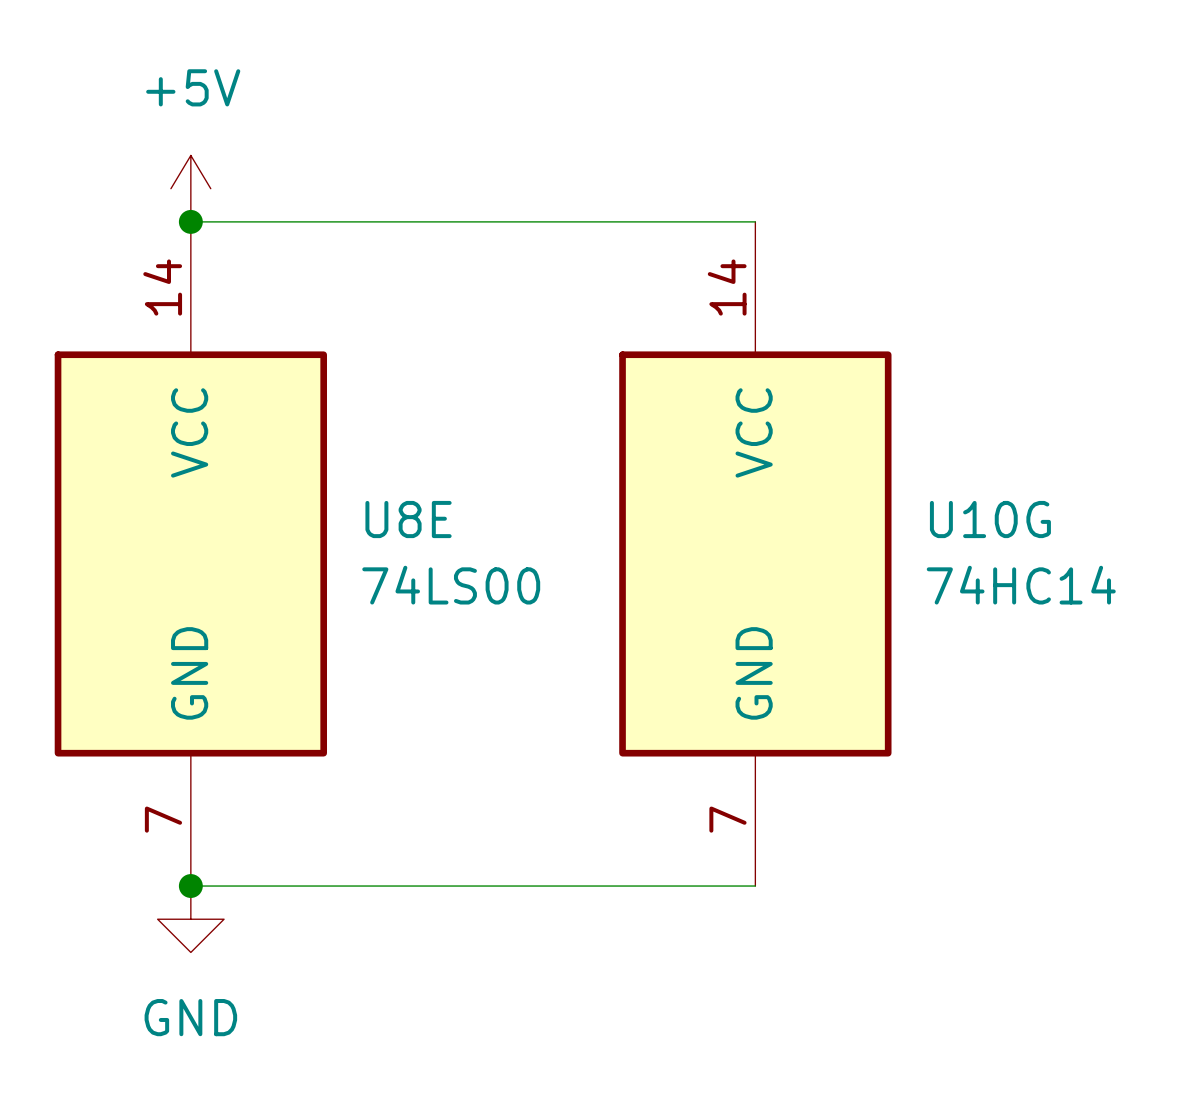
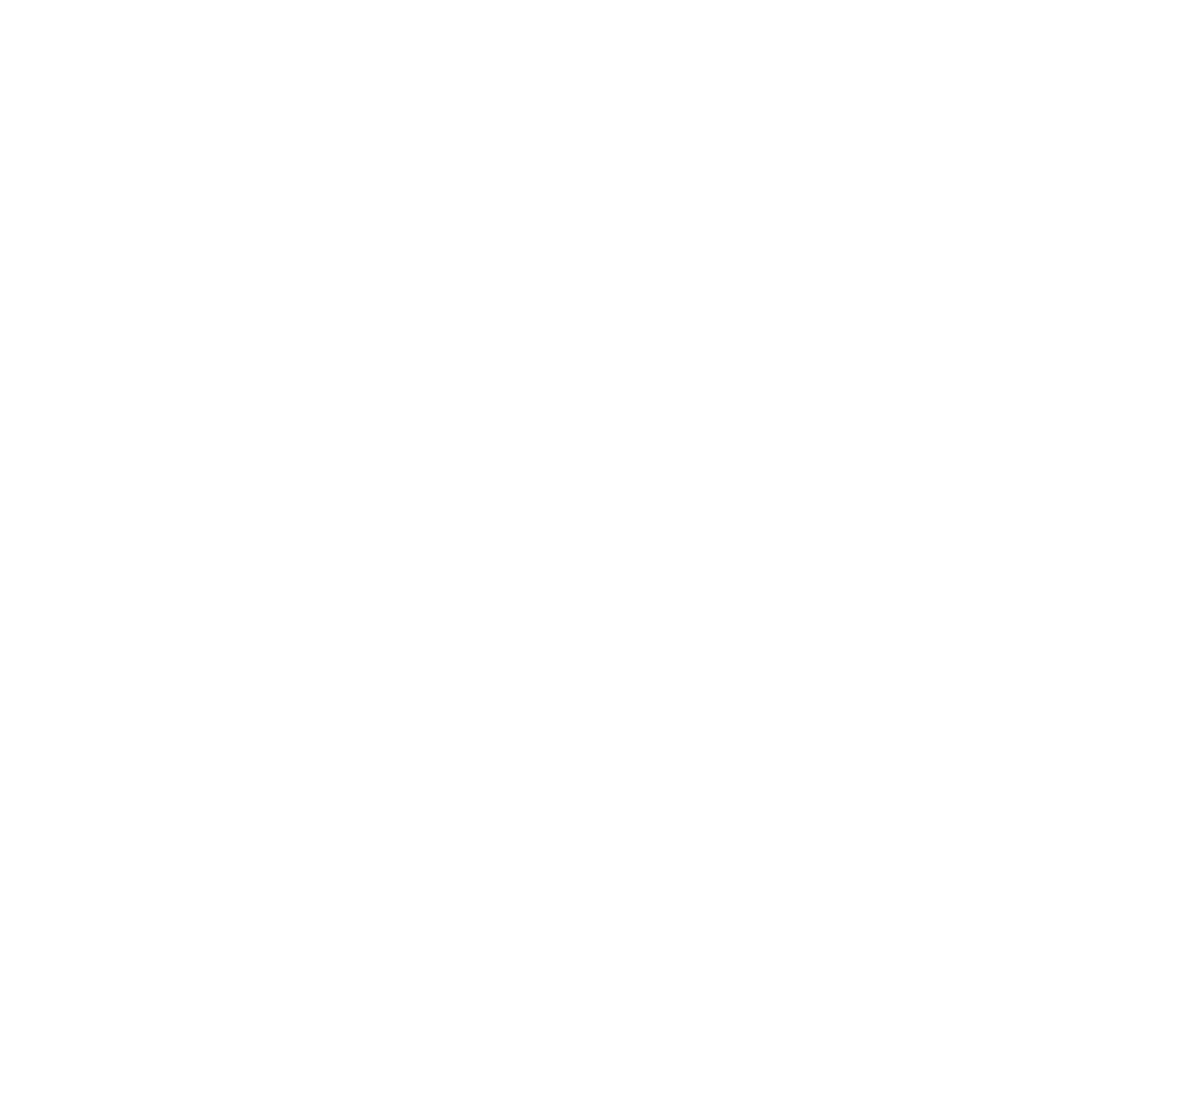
power symbol: +5V (190, 188) -> none
wire: (190, 221) (755, 221) -> none
junction: (190, 221) -> none
U8E: 74LS00 (190, 553) -> none
U10G: 74HC14 (755, 553) -> none
wire: (190, 886) (755, 886) -> none
junction: (190, 886) -> none
power symbol: GND (190, 919) -> none

